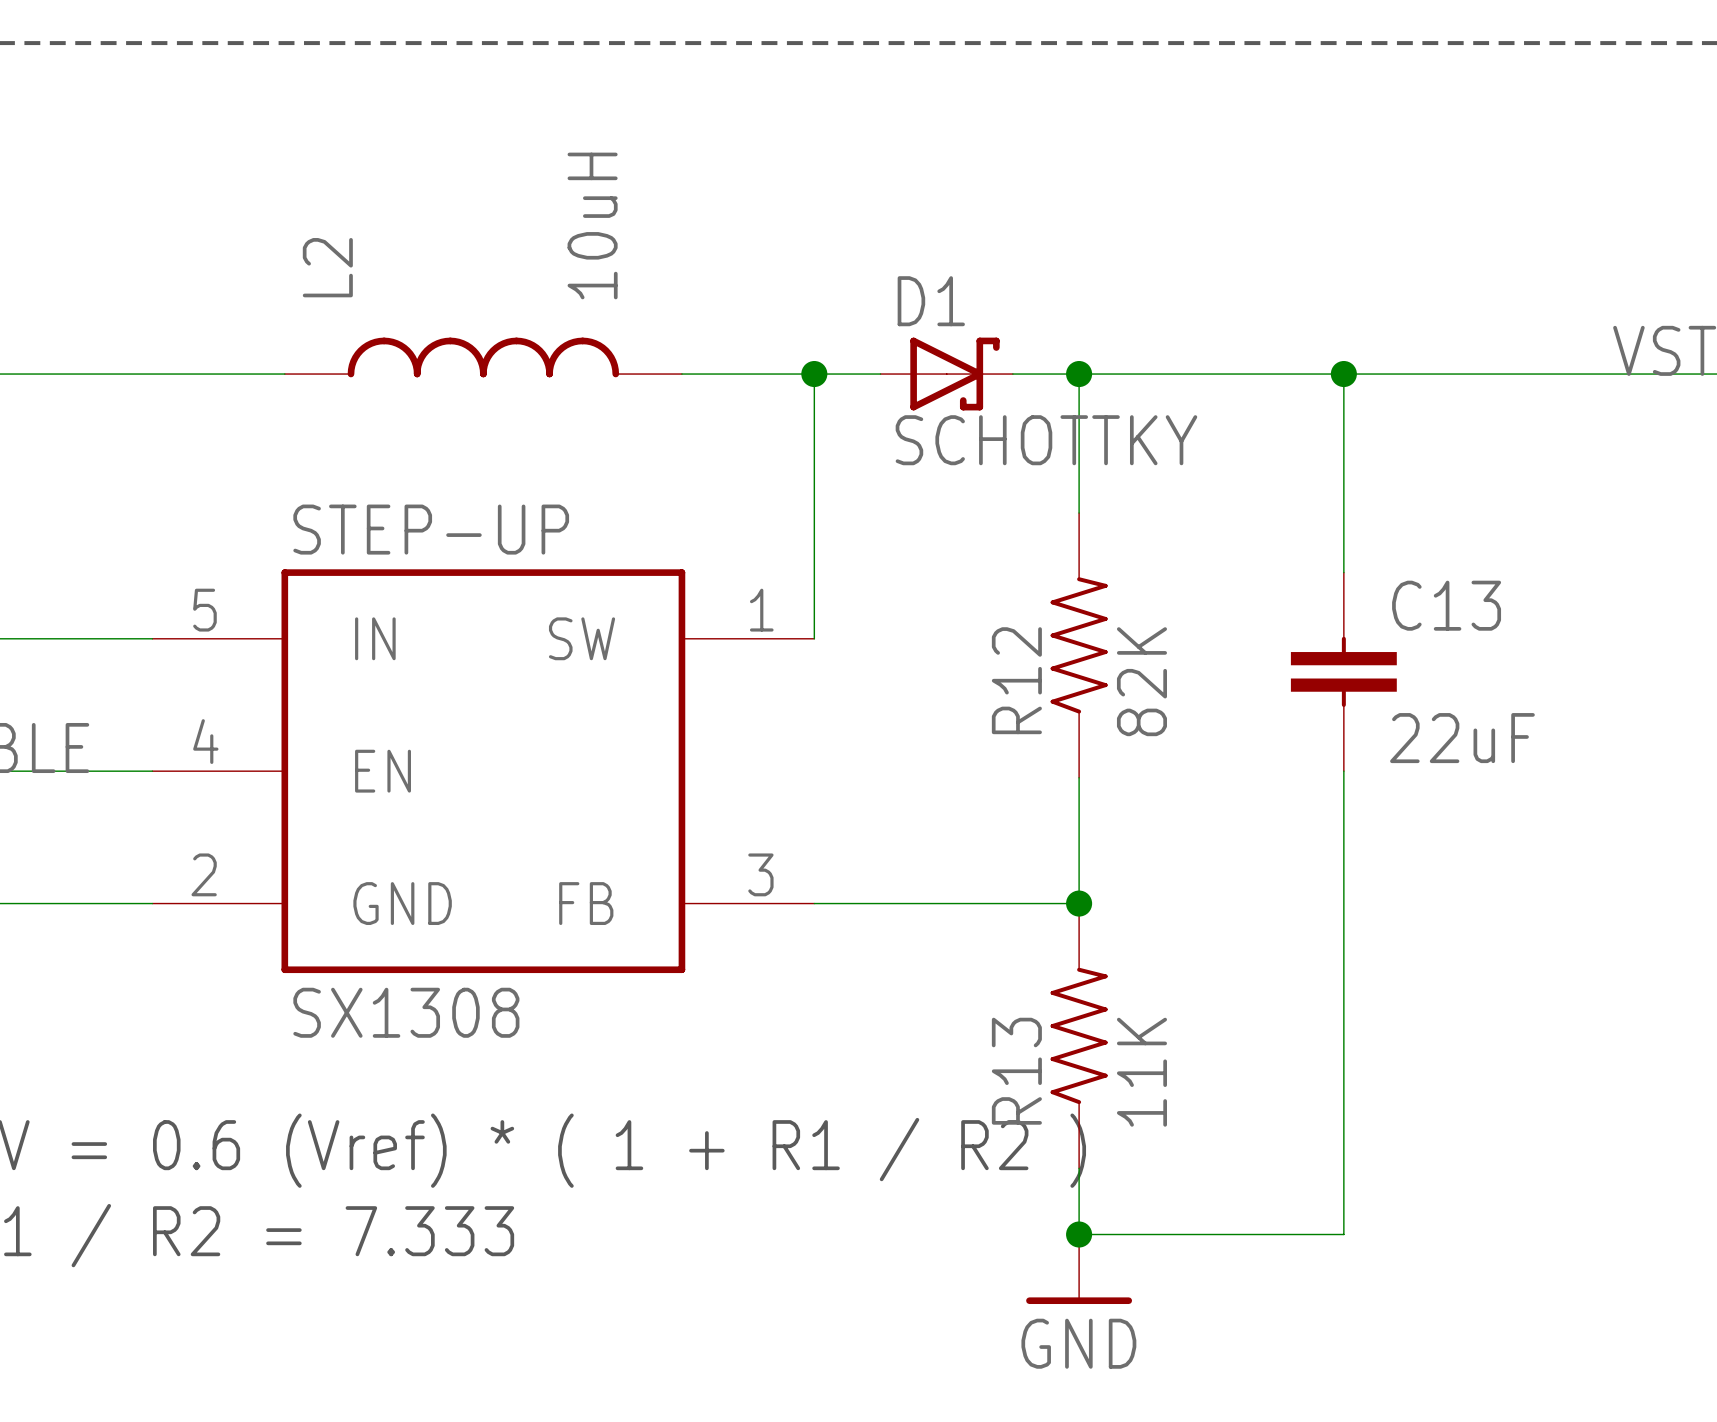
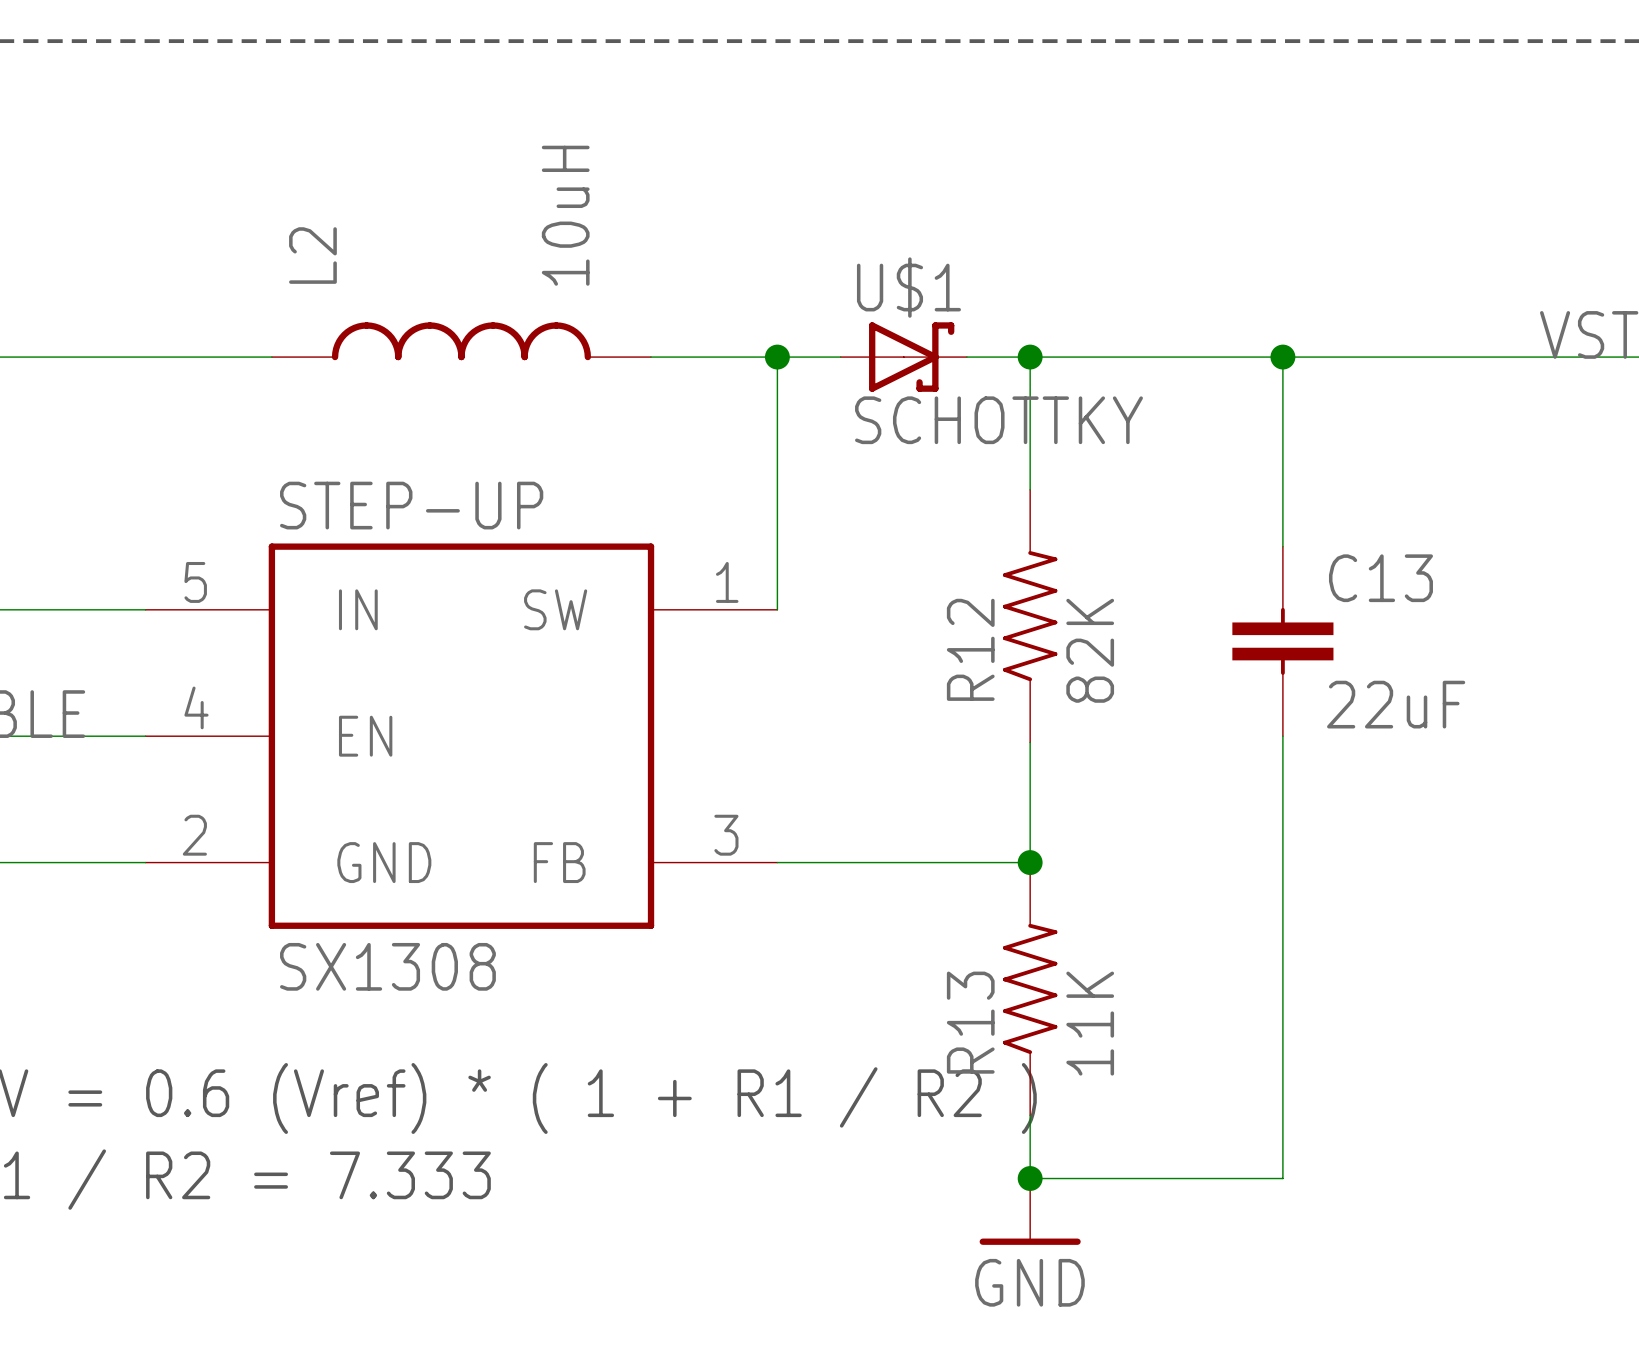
D1 name: D1 (931, 301) -> U$1 (908, 287)

